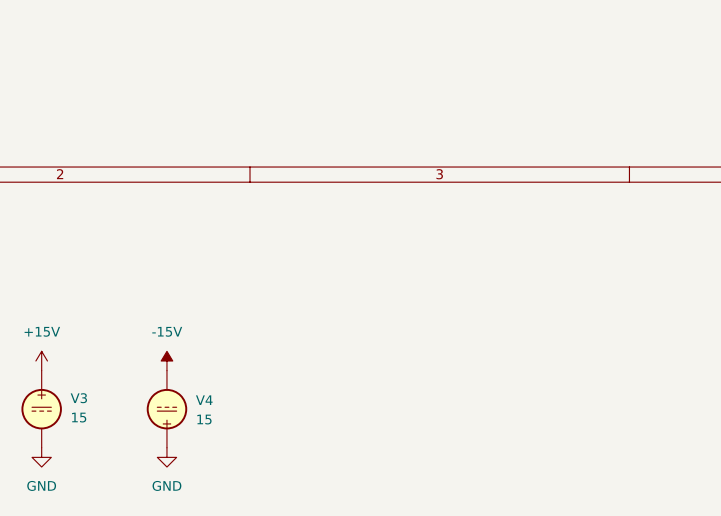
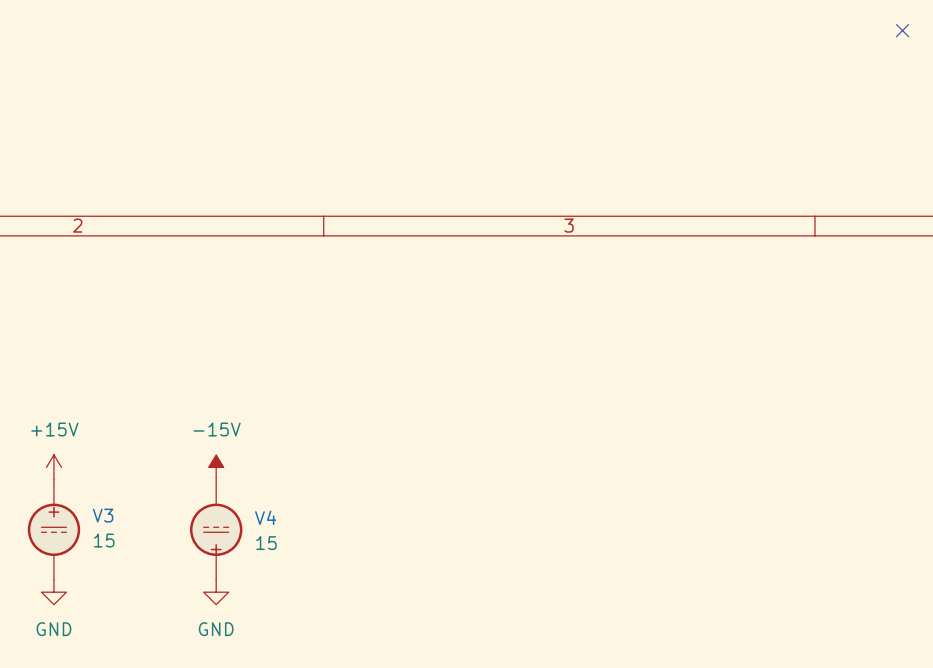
no-connect mark: none -> (902, 30)

